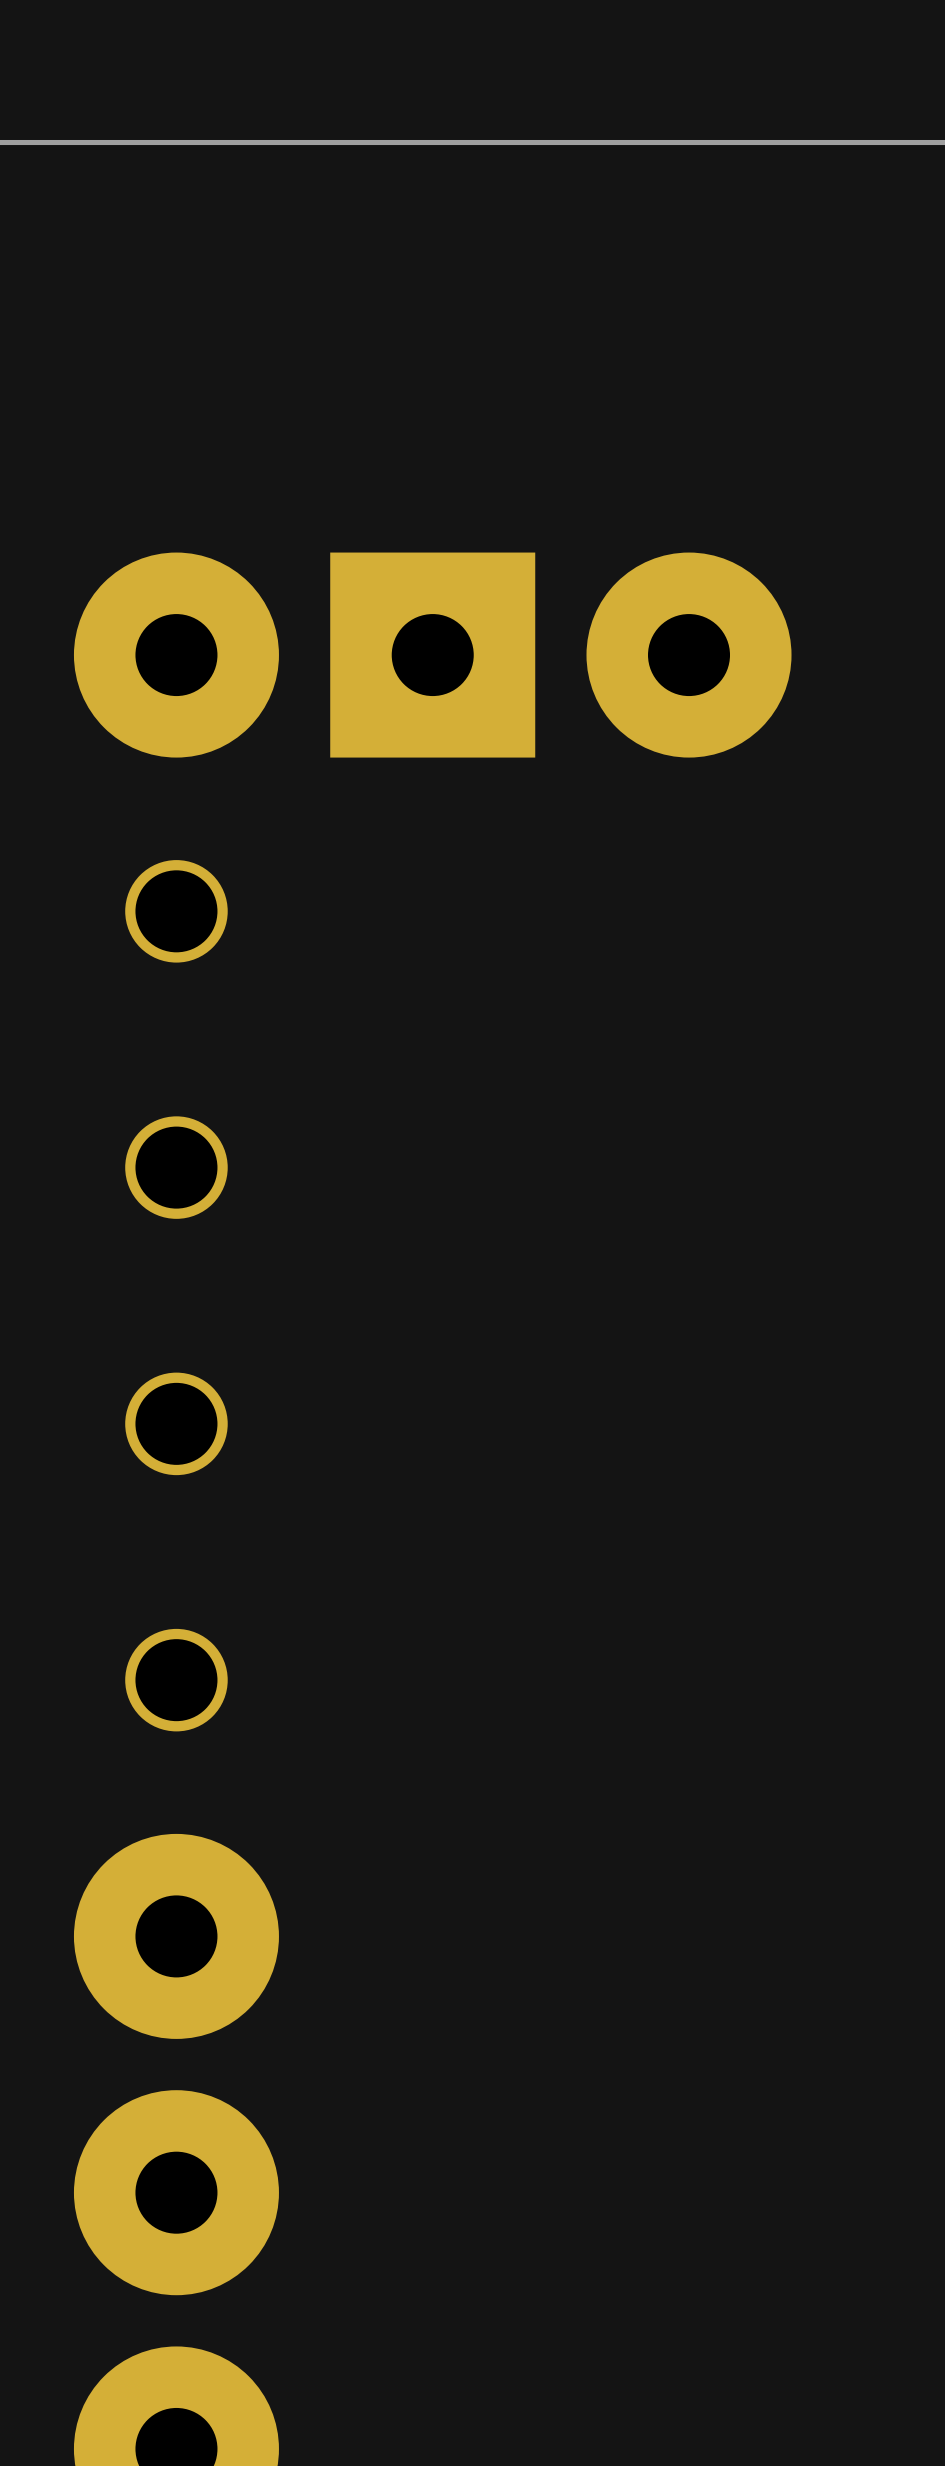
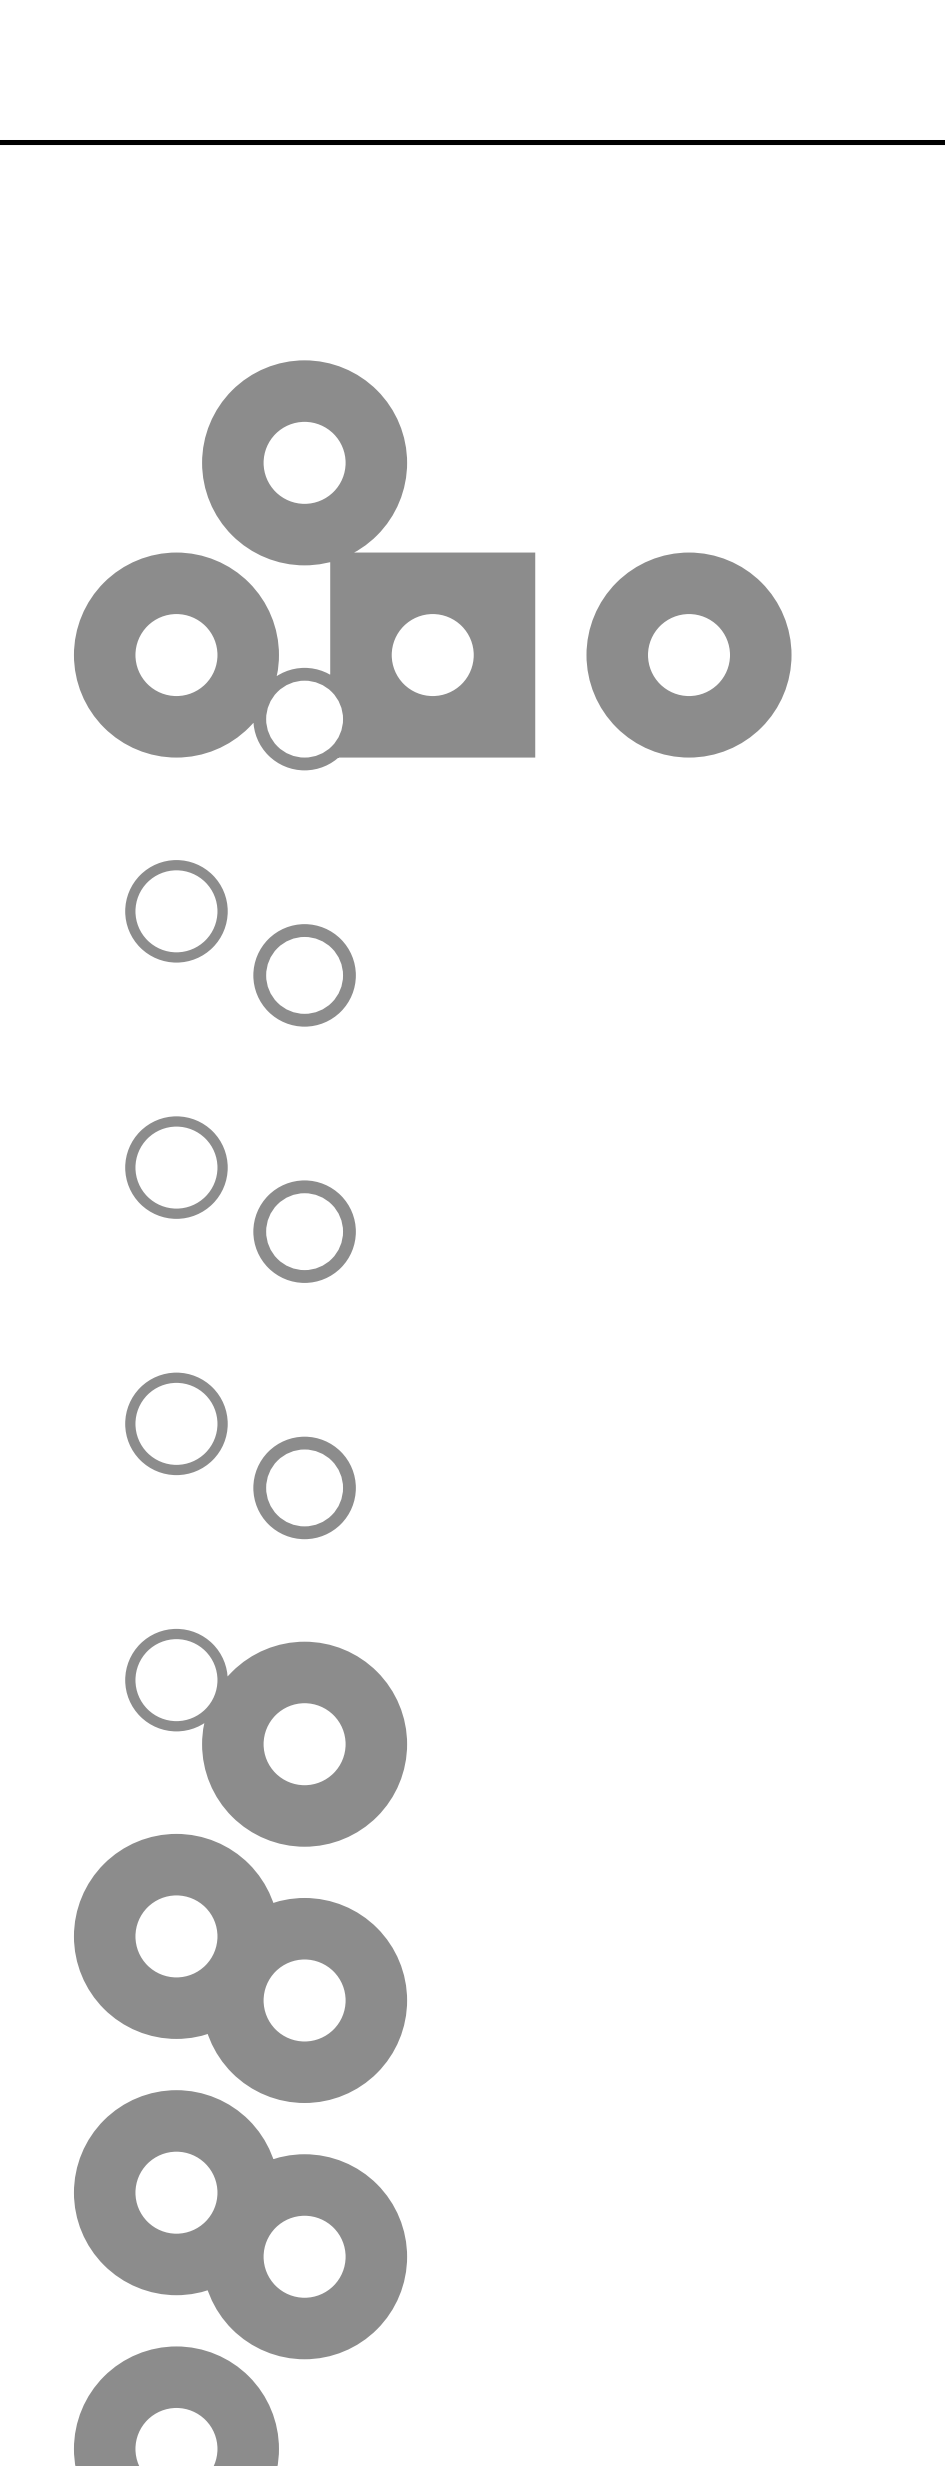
part: none -> (304, 1359)

